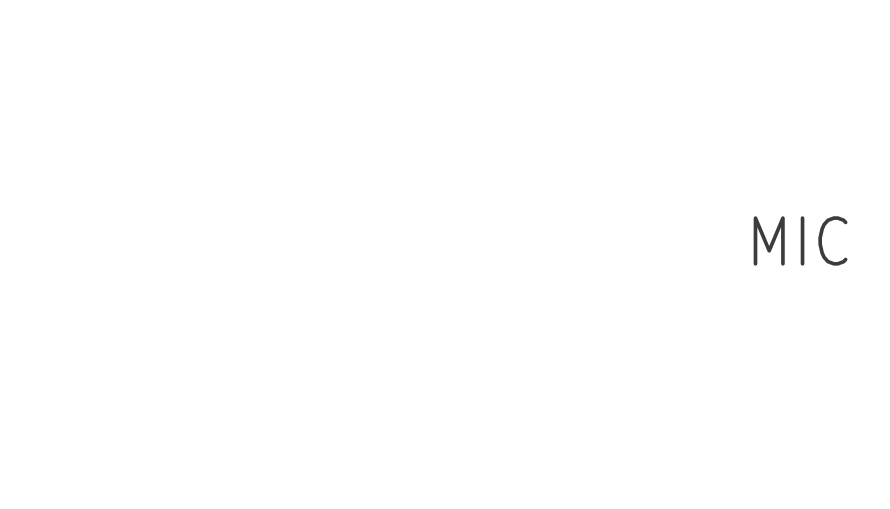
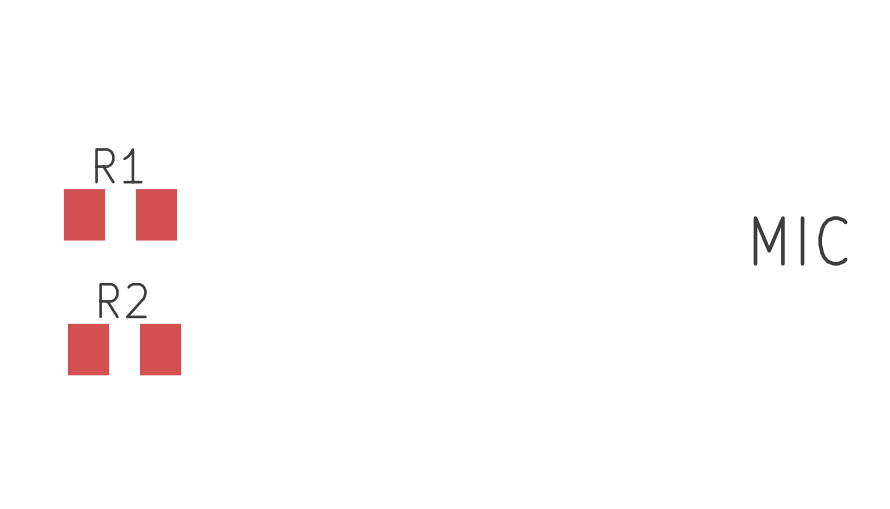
R1: none -> (120, 214)
R2: none -> (124, 349)

